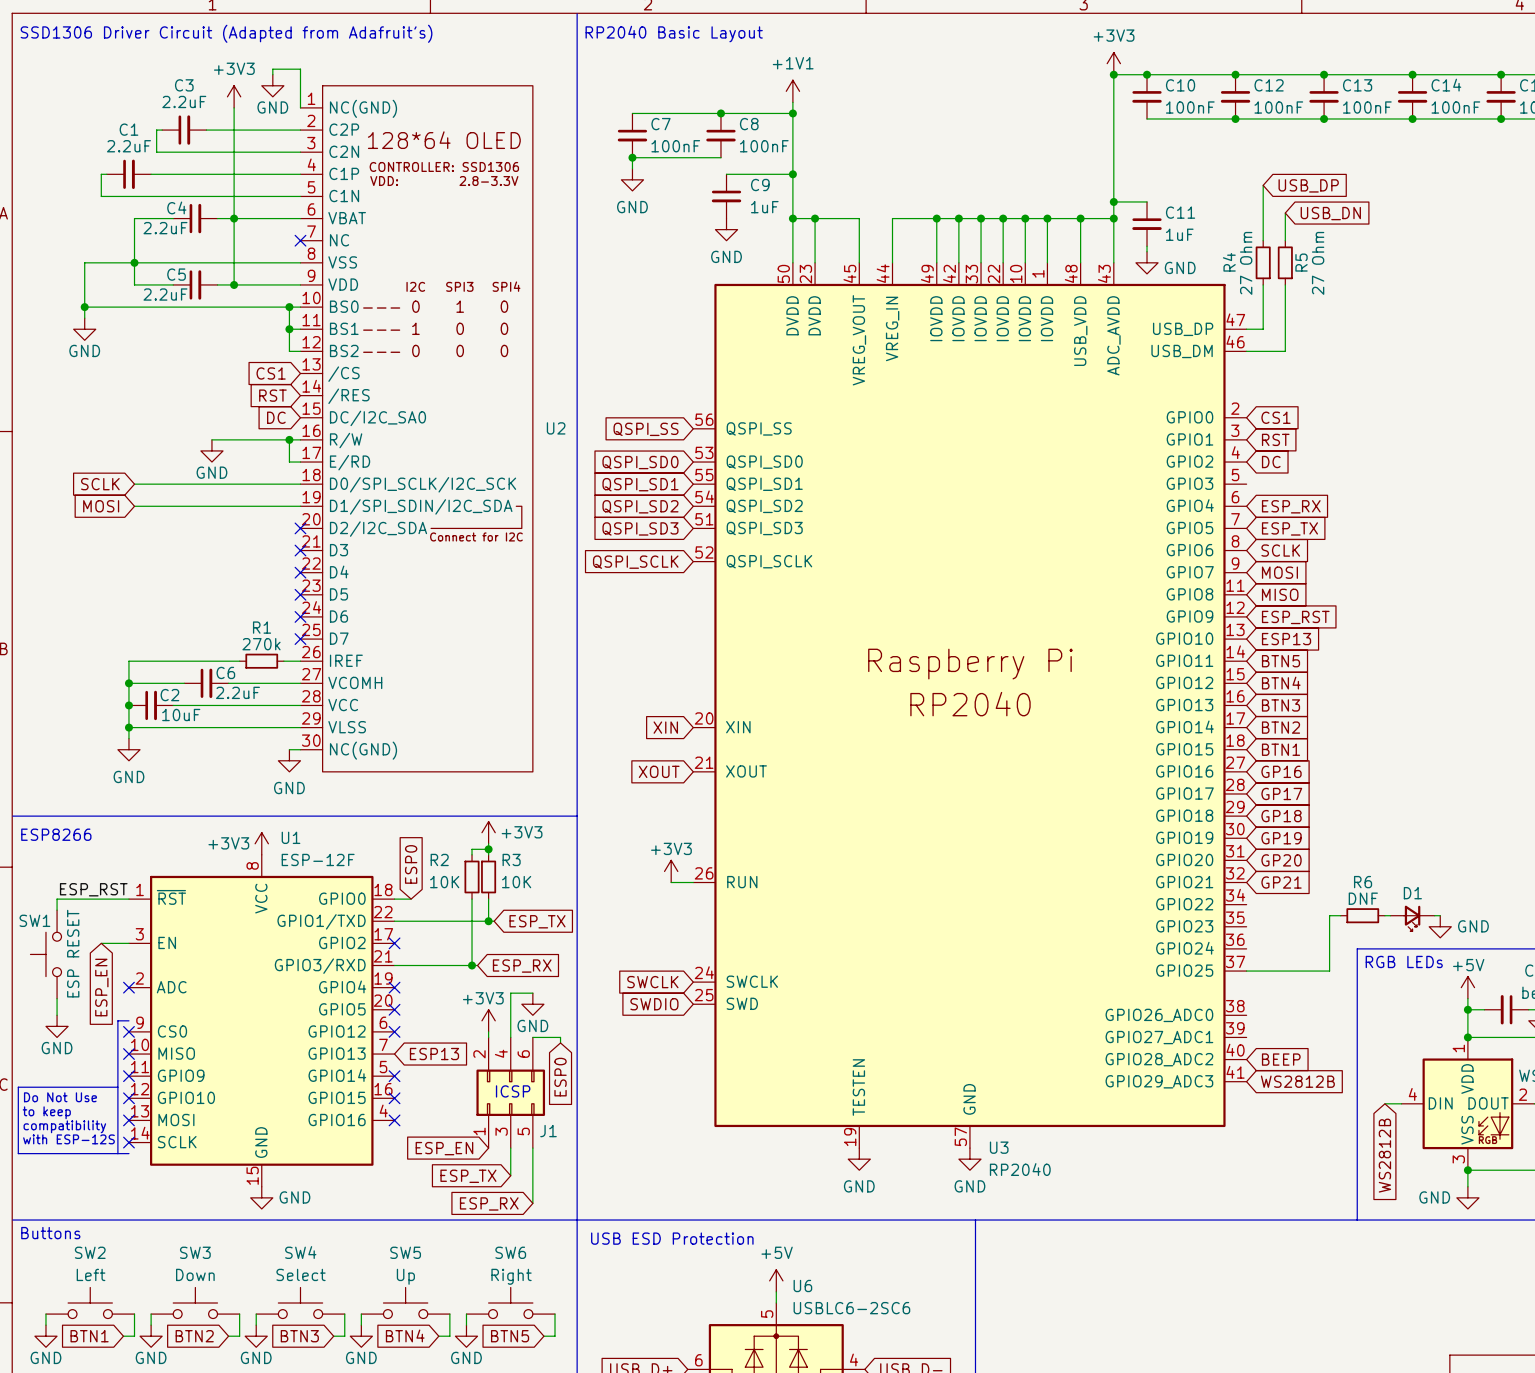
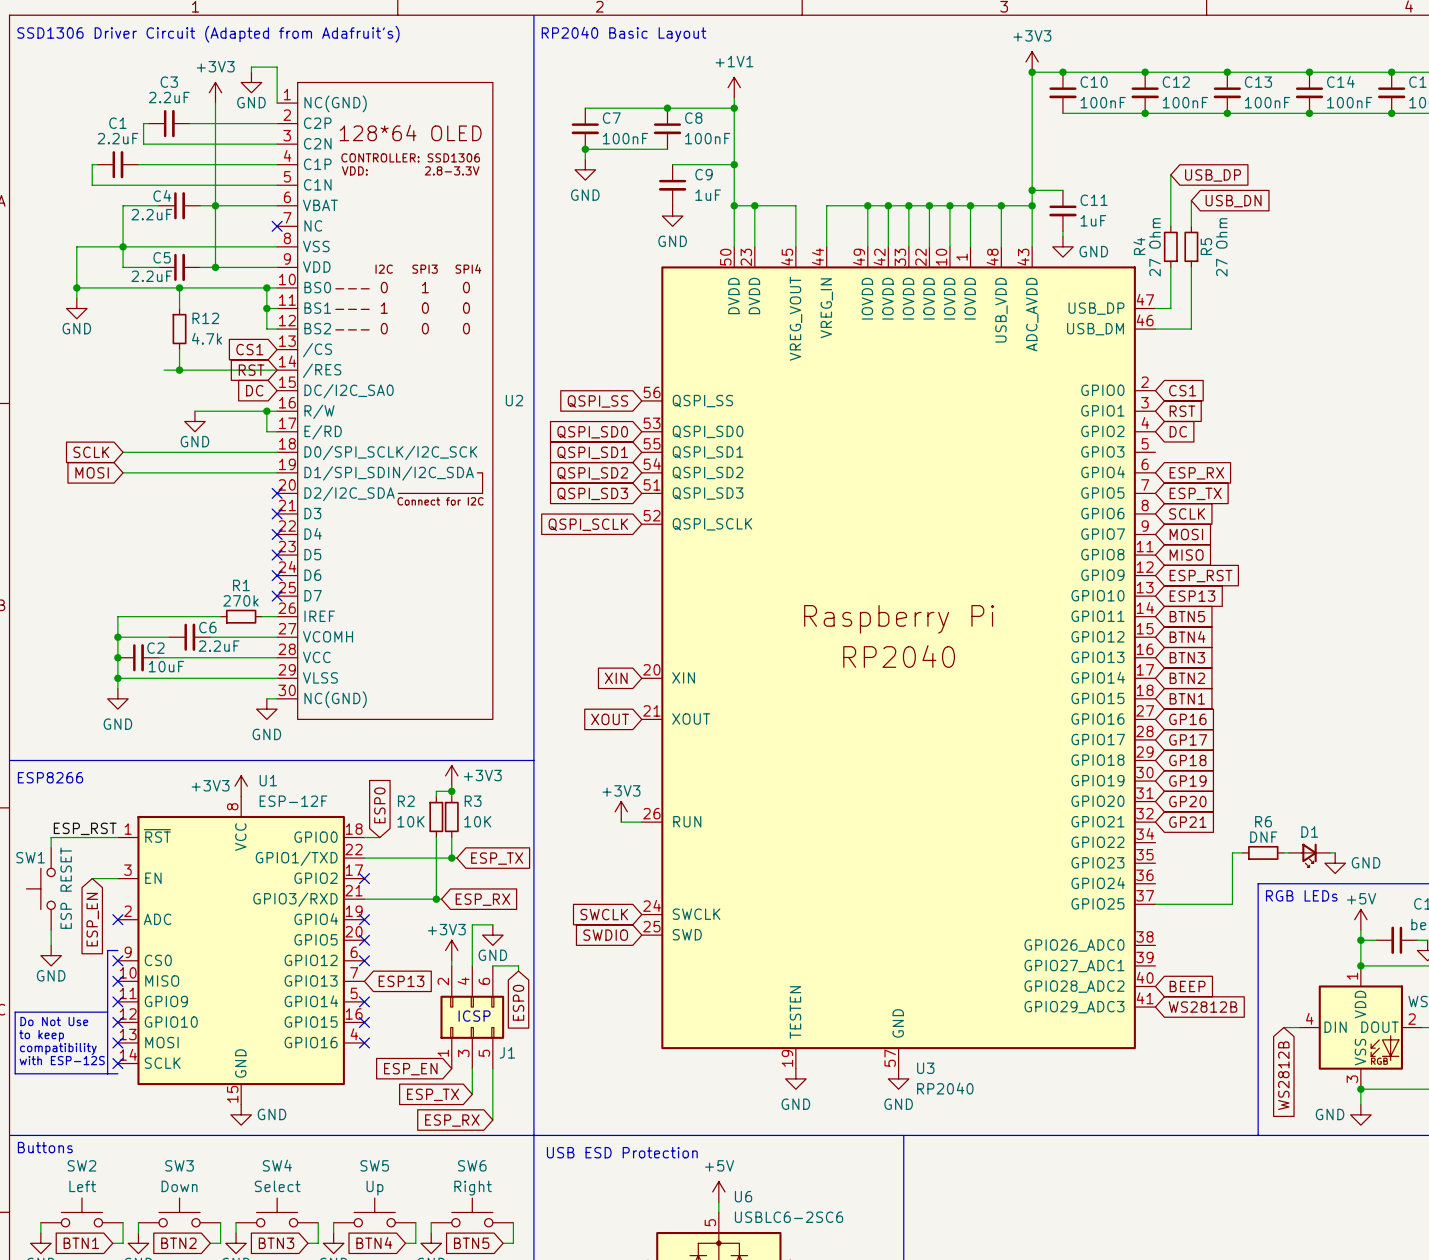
wire: none -> (179, 287) (179, 308)
junction: none -> (179, 287)
R12: none -> 4.7k (179, 329)
wire: none -> (179, 349) (179, 370)
wire: none -> (164, 370) (277, 370)
junction: none -> (179, 370)

